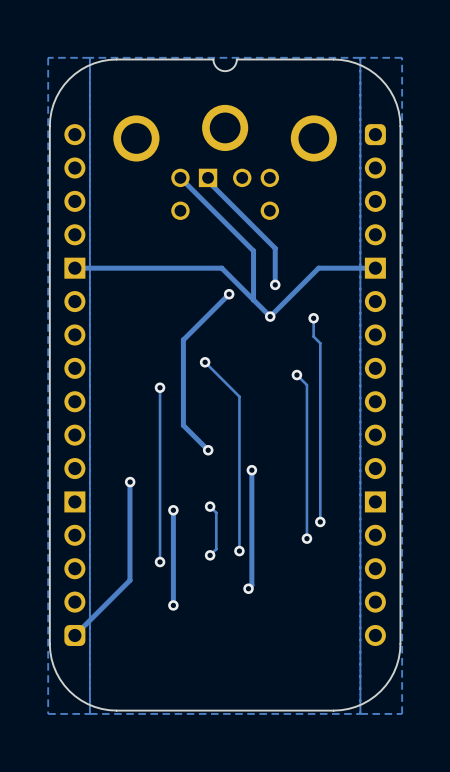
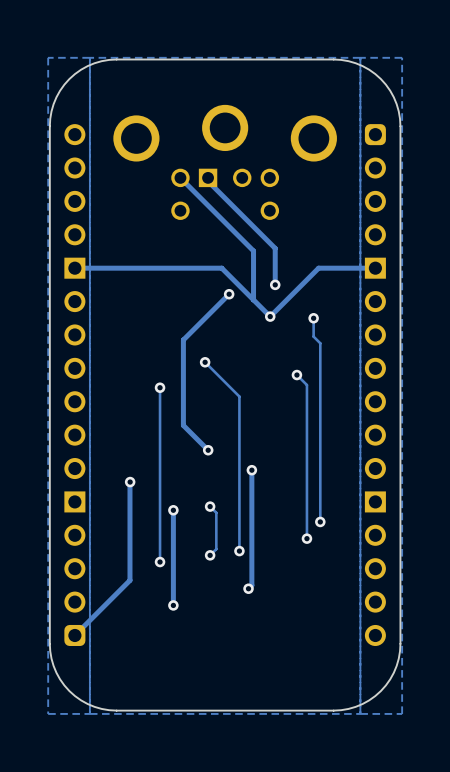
part footprint: [49, 58, 402, 712] -> [49, 58, 402, 712]

